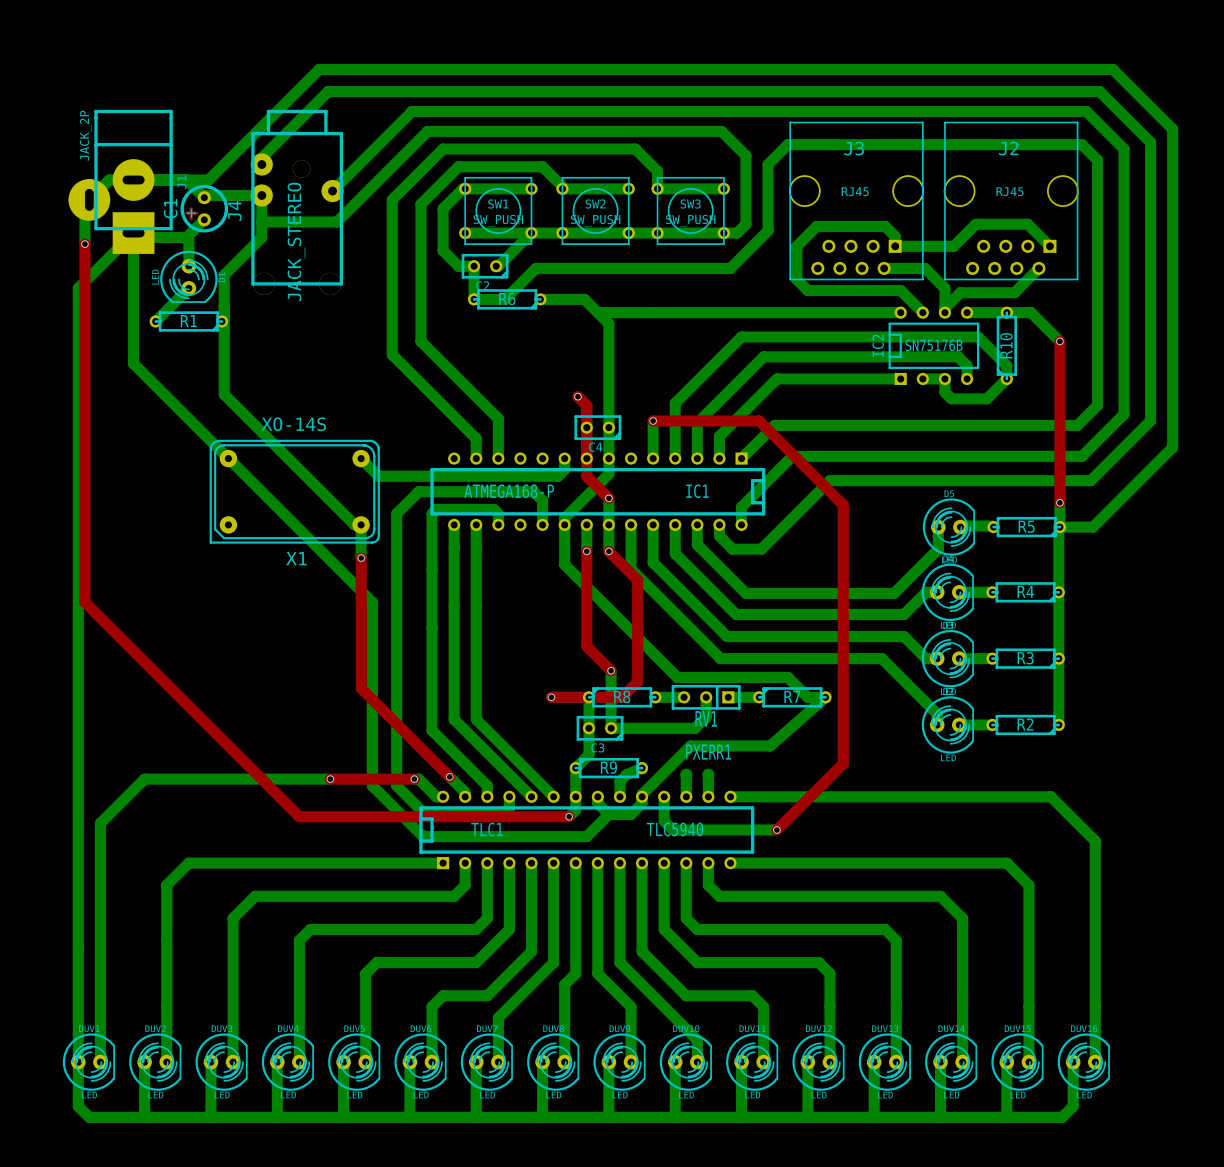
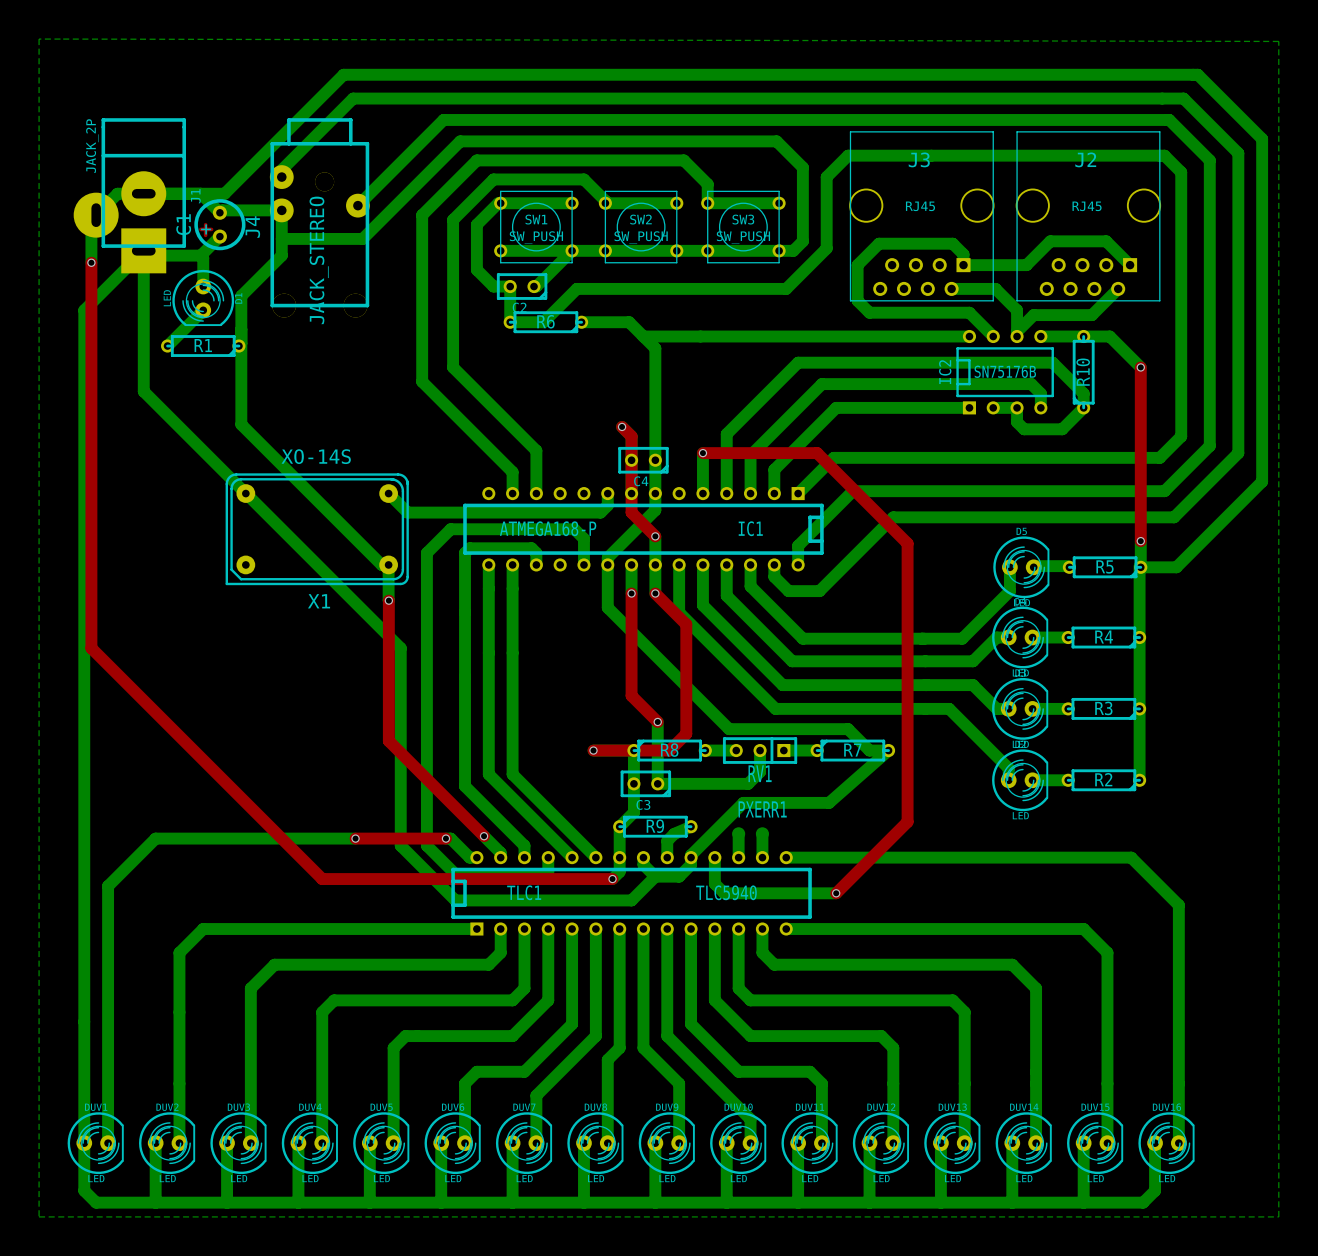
bottom zone outline: none -> (39, 39) (1278, 41) (1278, 1216) (39, 1216) (39, 39)

